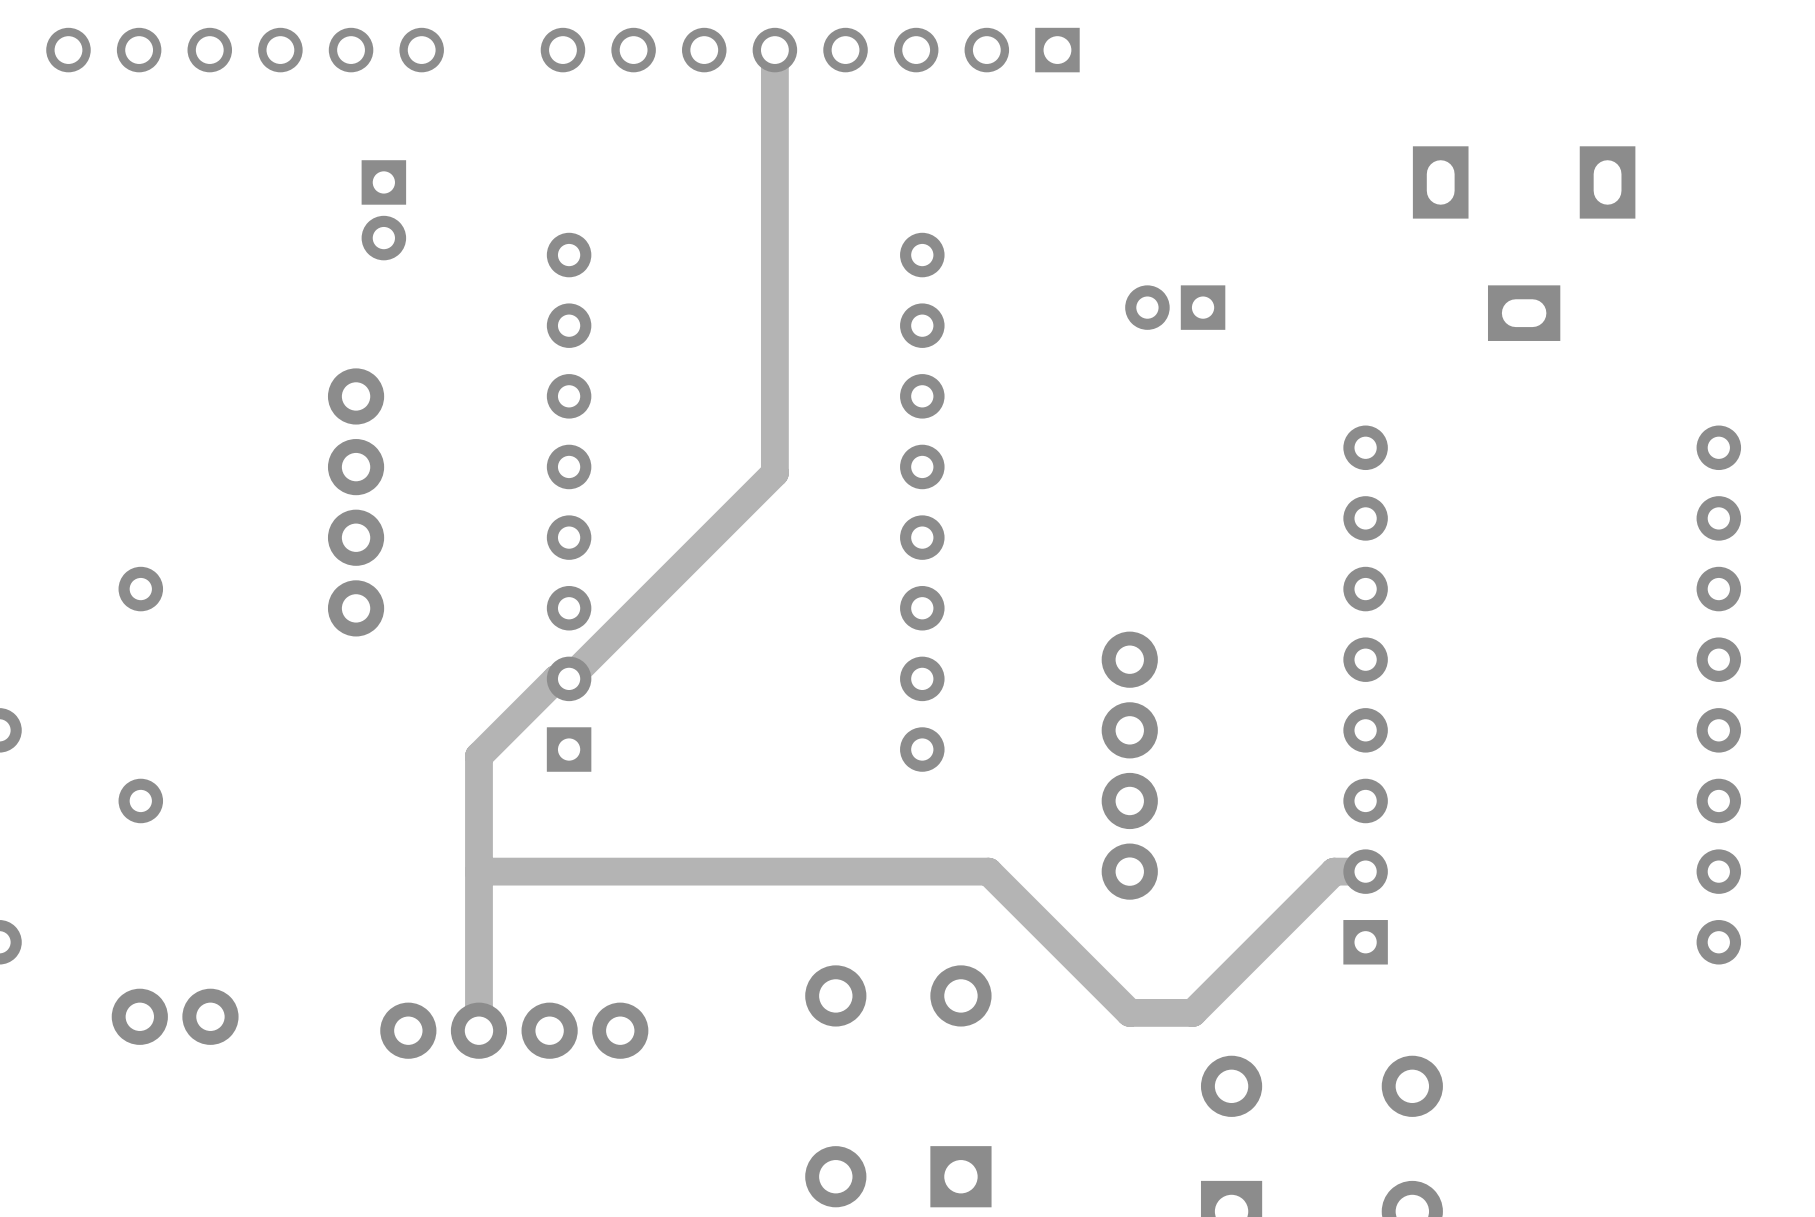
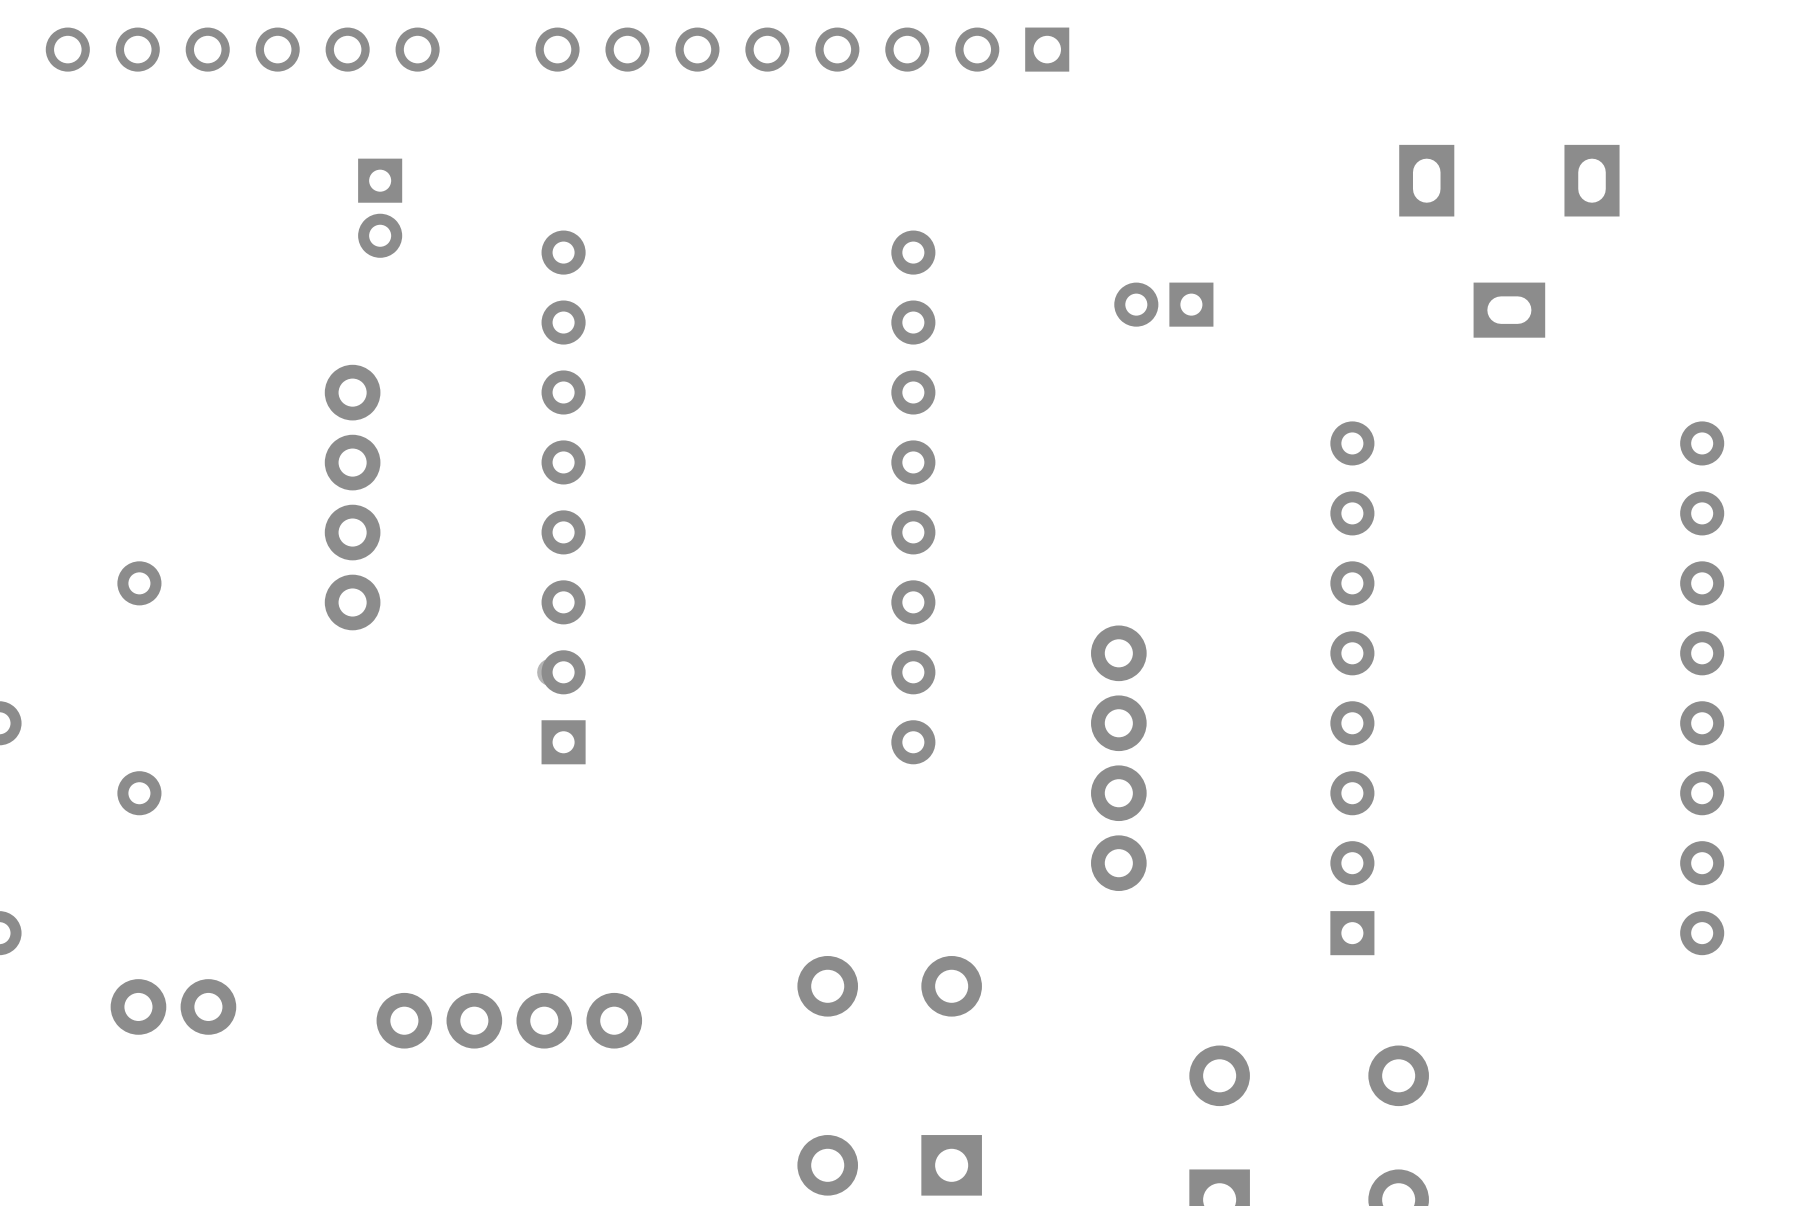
track: (774, 50) (774, 473) (569, 678) -> none
track: (556, 678) (478, 756) (478, 1030) -> none
track: (1365, 871) (1334, 871) (1192, 1012) (1129, 1012) (988, 871) (478, 871) -> none

